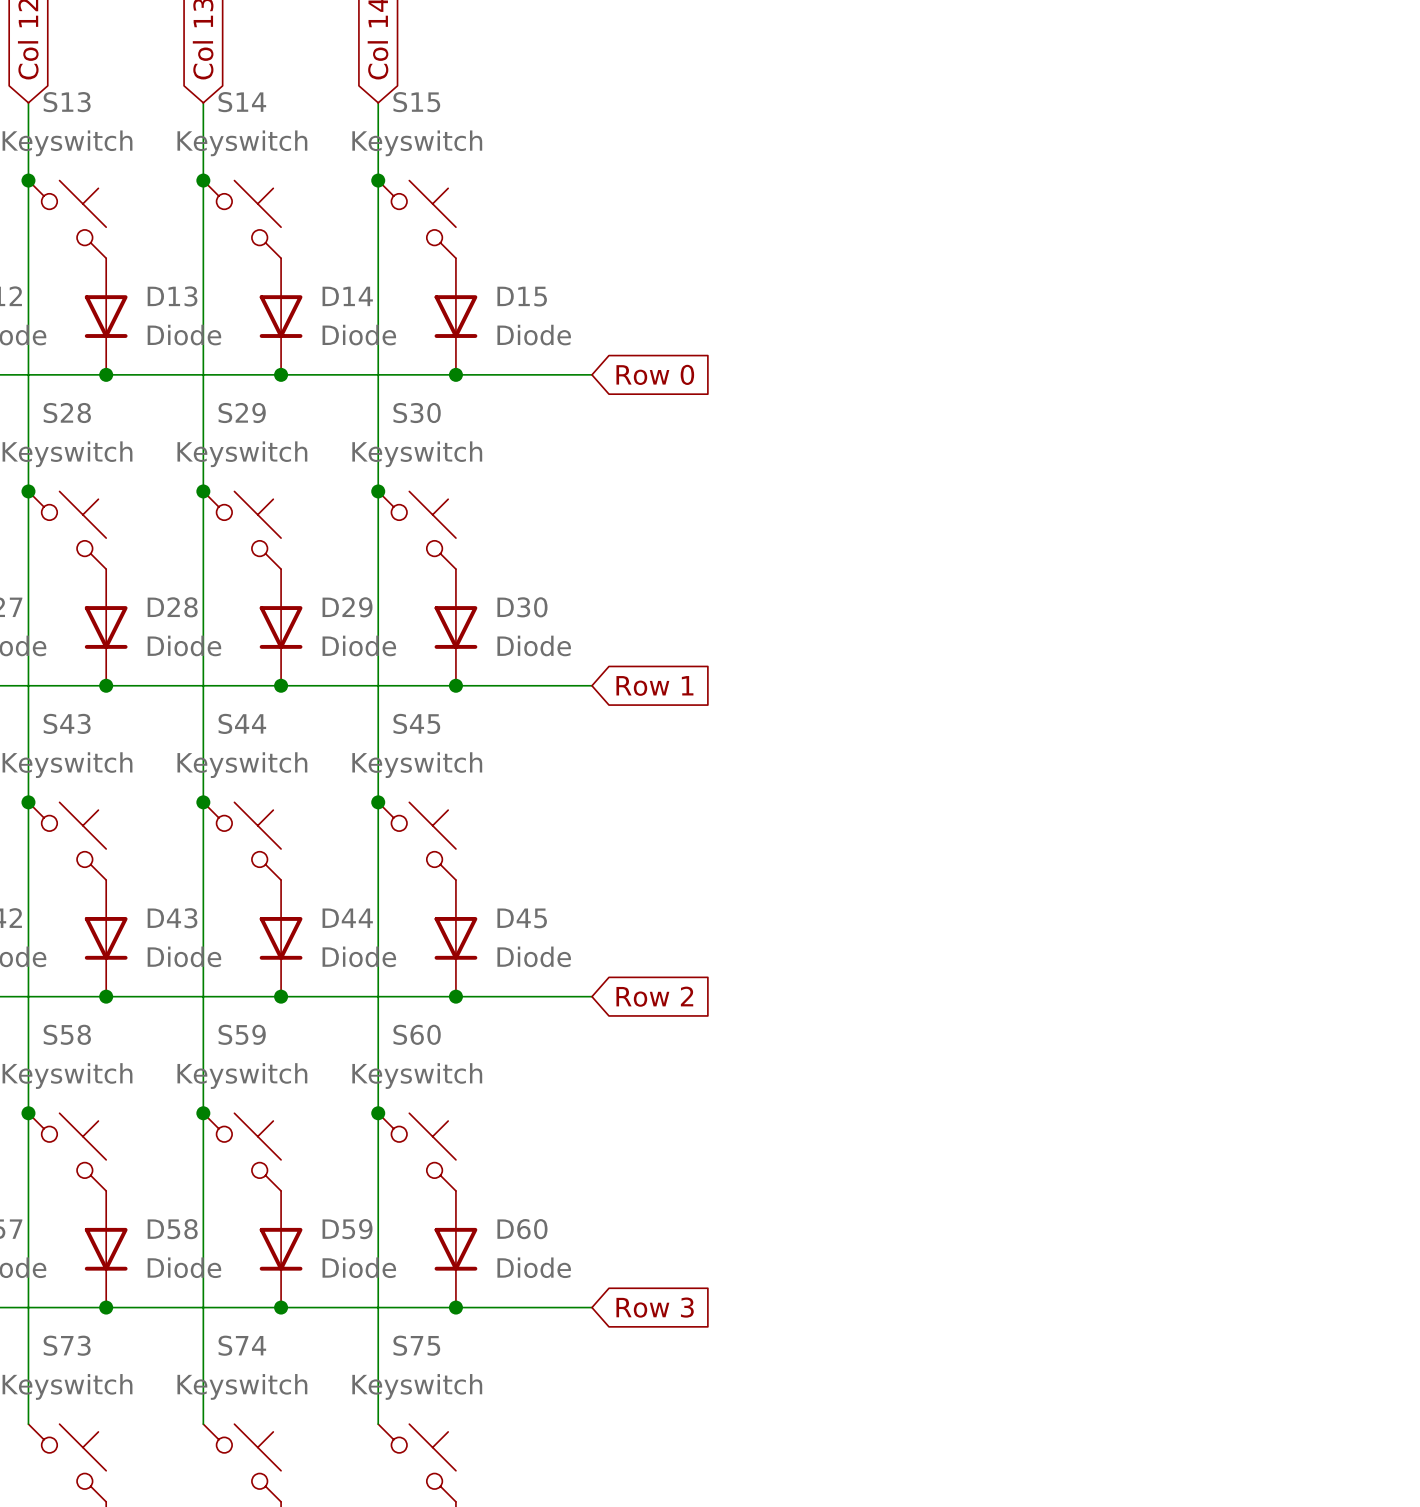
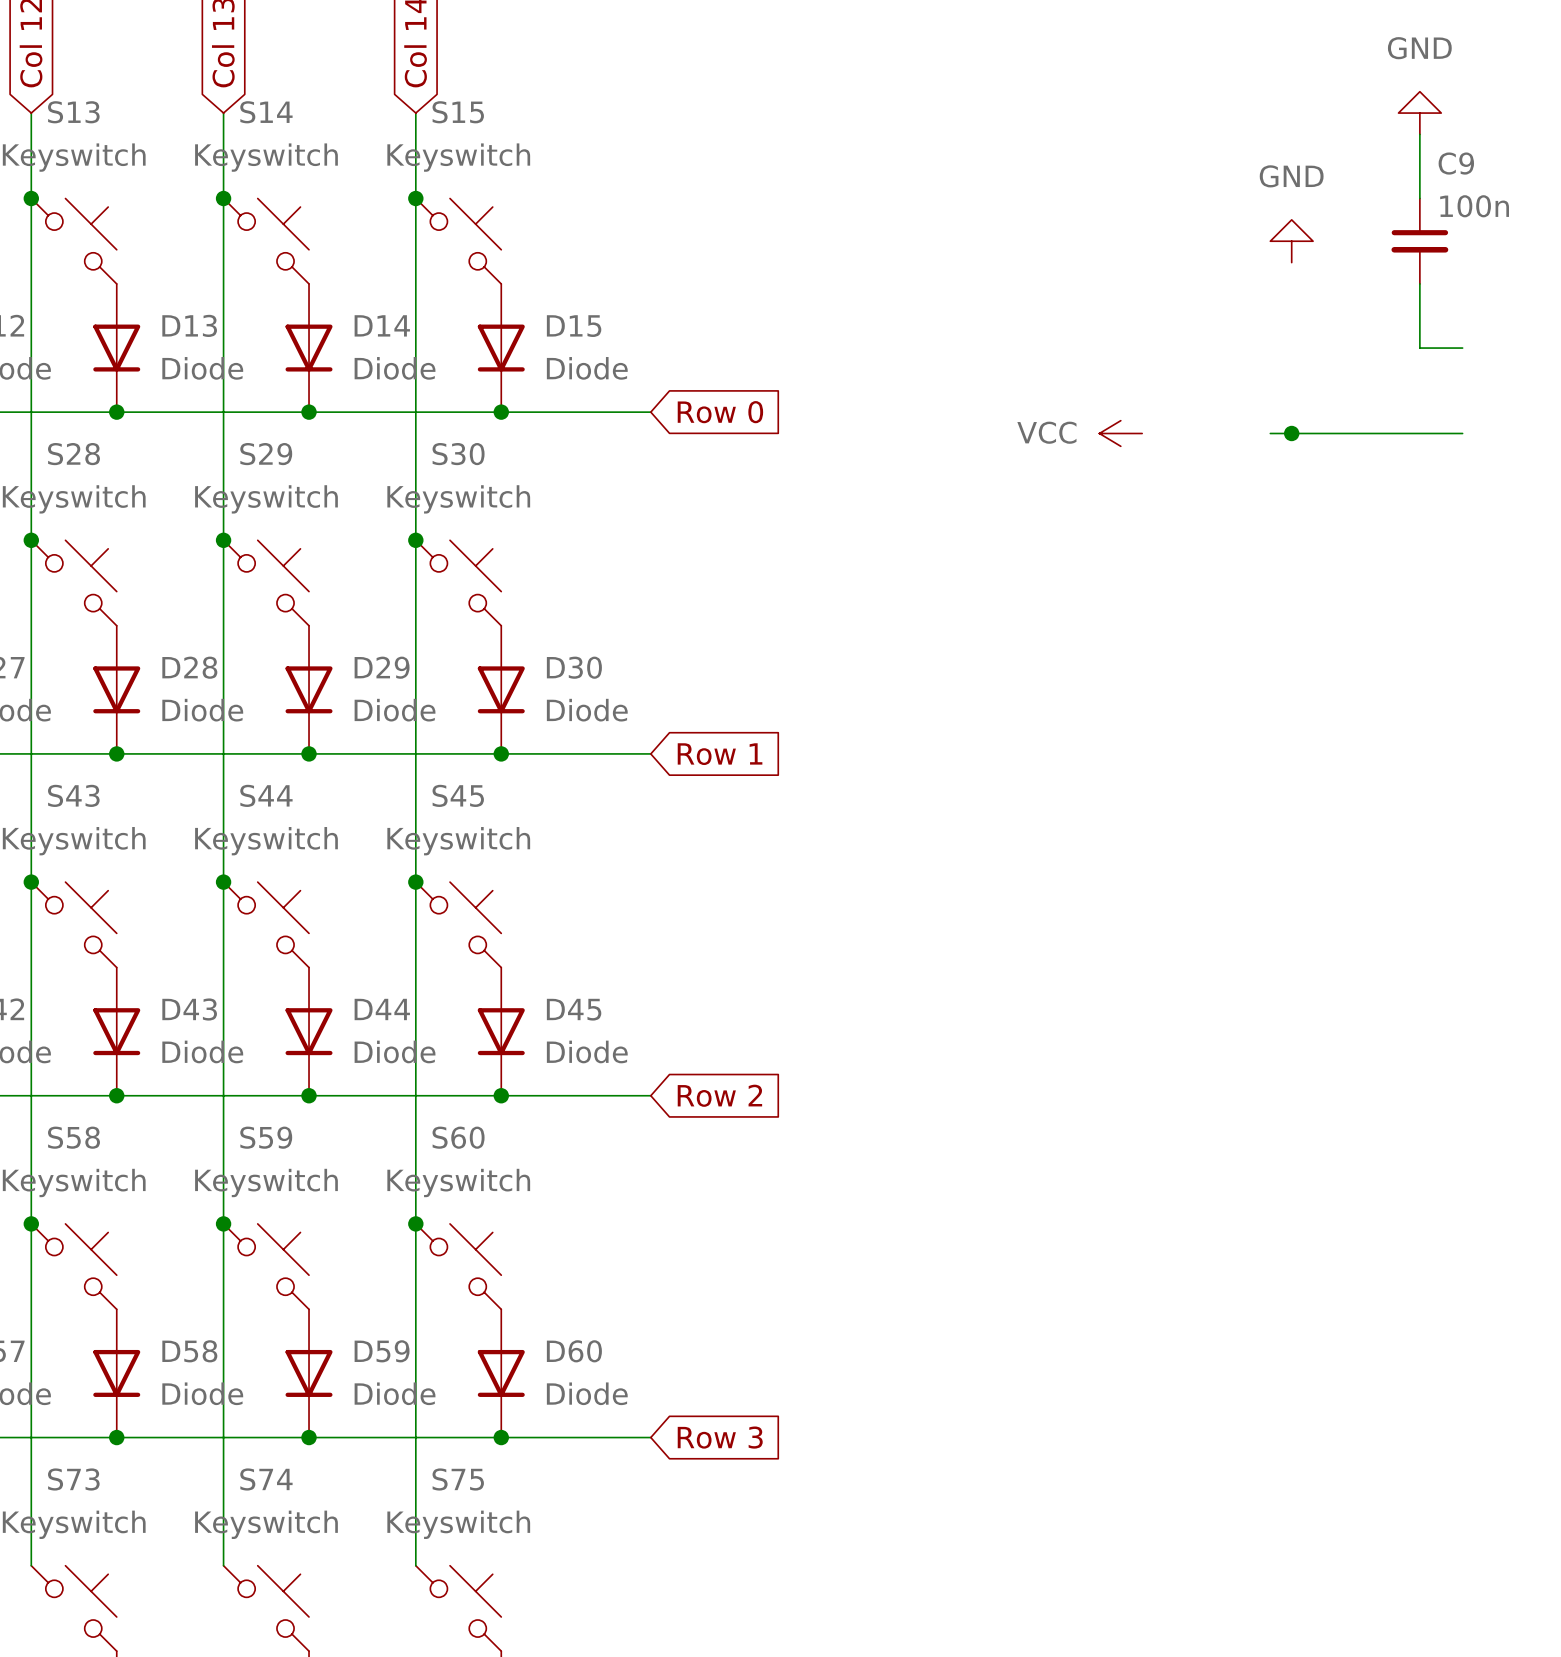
power symbol: none -> GND (1419, 113)
wire: none -> (1419, 134) (1419, 198)
power symbol: none -> GND (1291, 241)
C9: none -> 100n (1419, 241)
wire: none -> (1419, 283) (1419, 348) (1462, 348)
power symbol: none -> VCC (1120, 433)
wire: none -> (1270, 433) (1462, 433)
junction: none -> (1291, 433)

